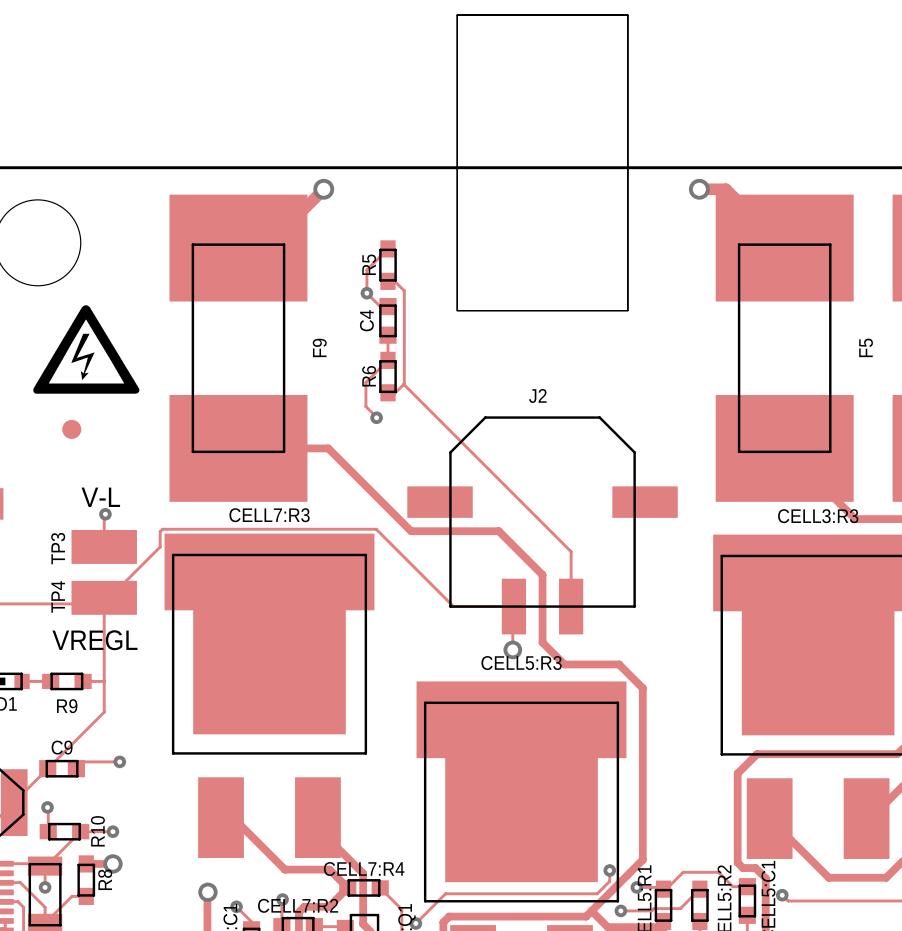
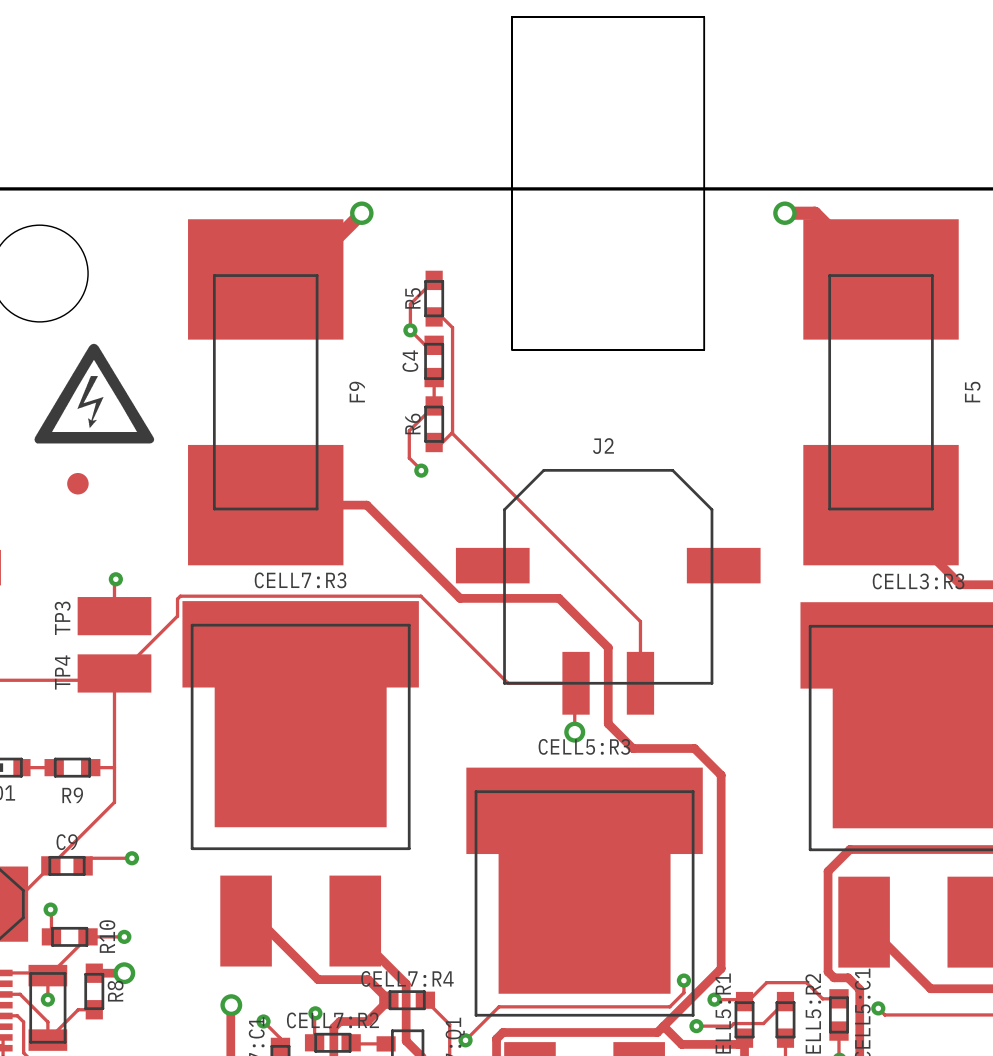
text: V-L (100, 497) -> none
text: VREGL (94, 640) -> none

